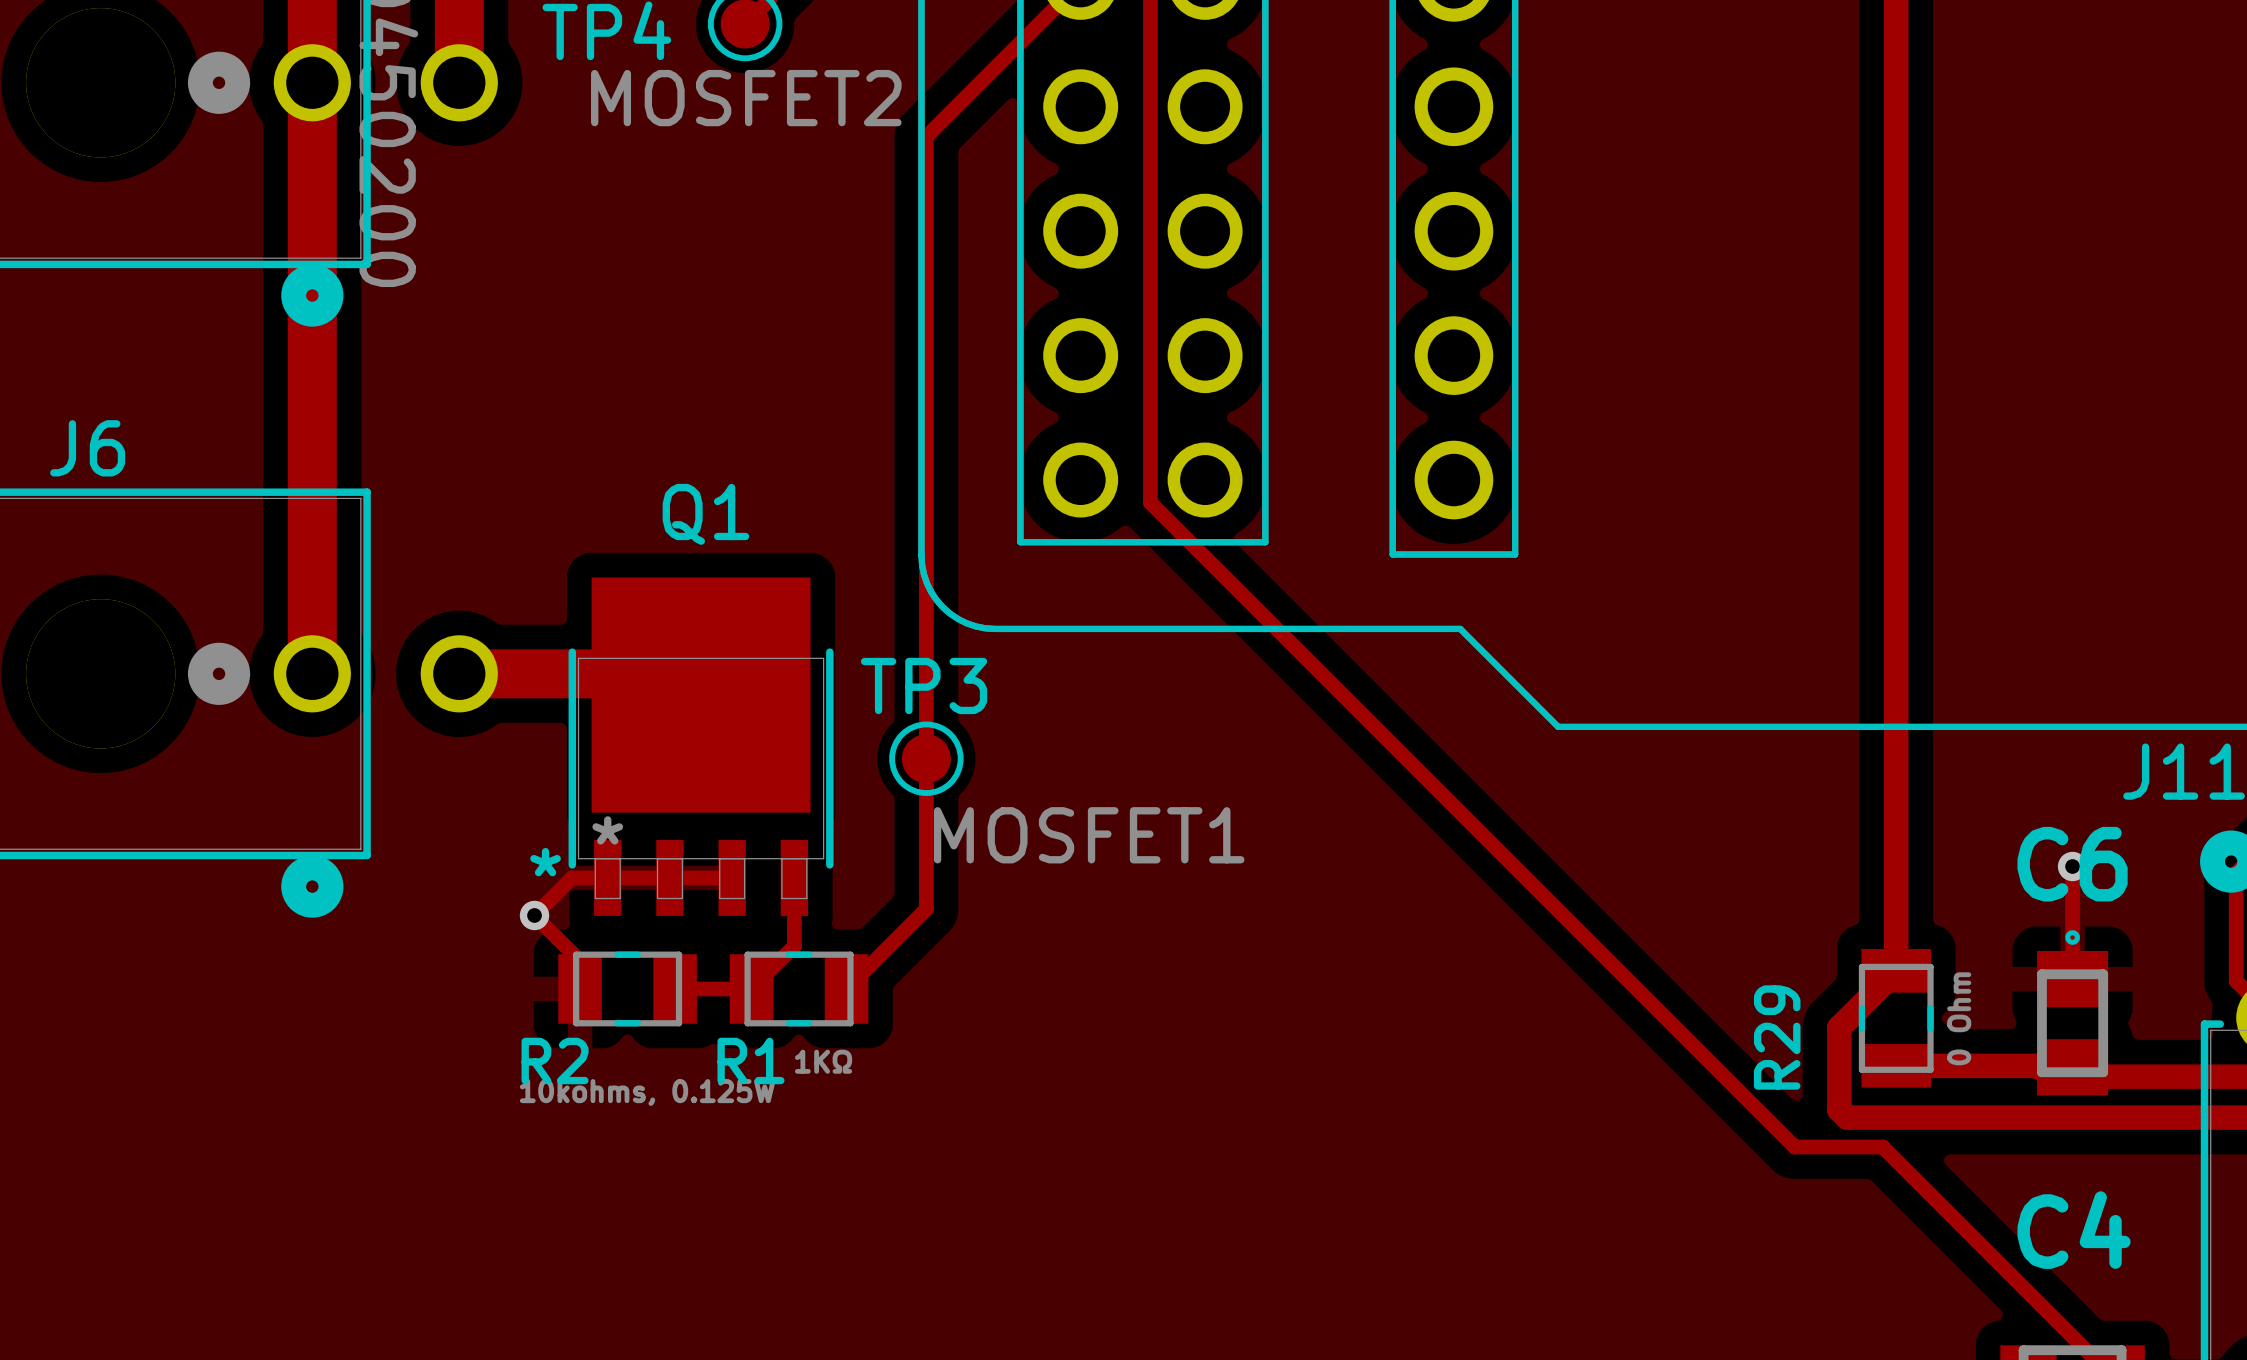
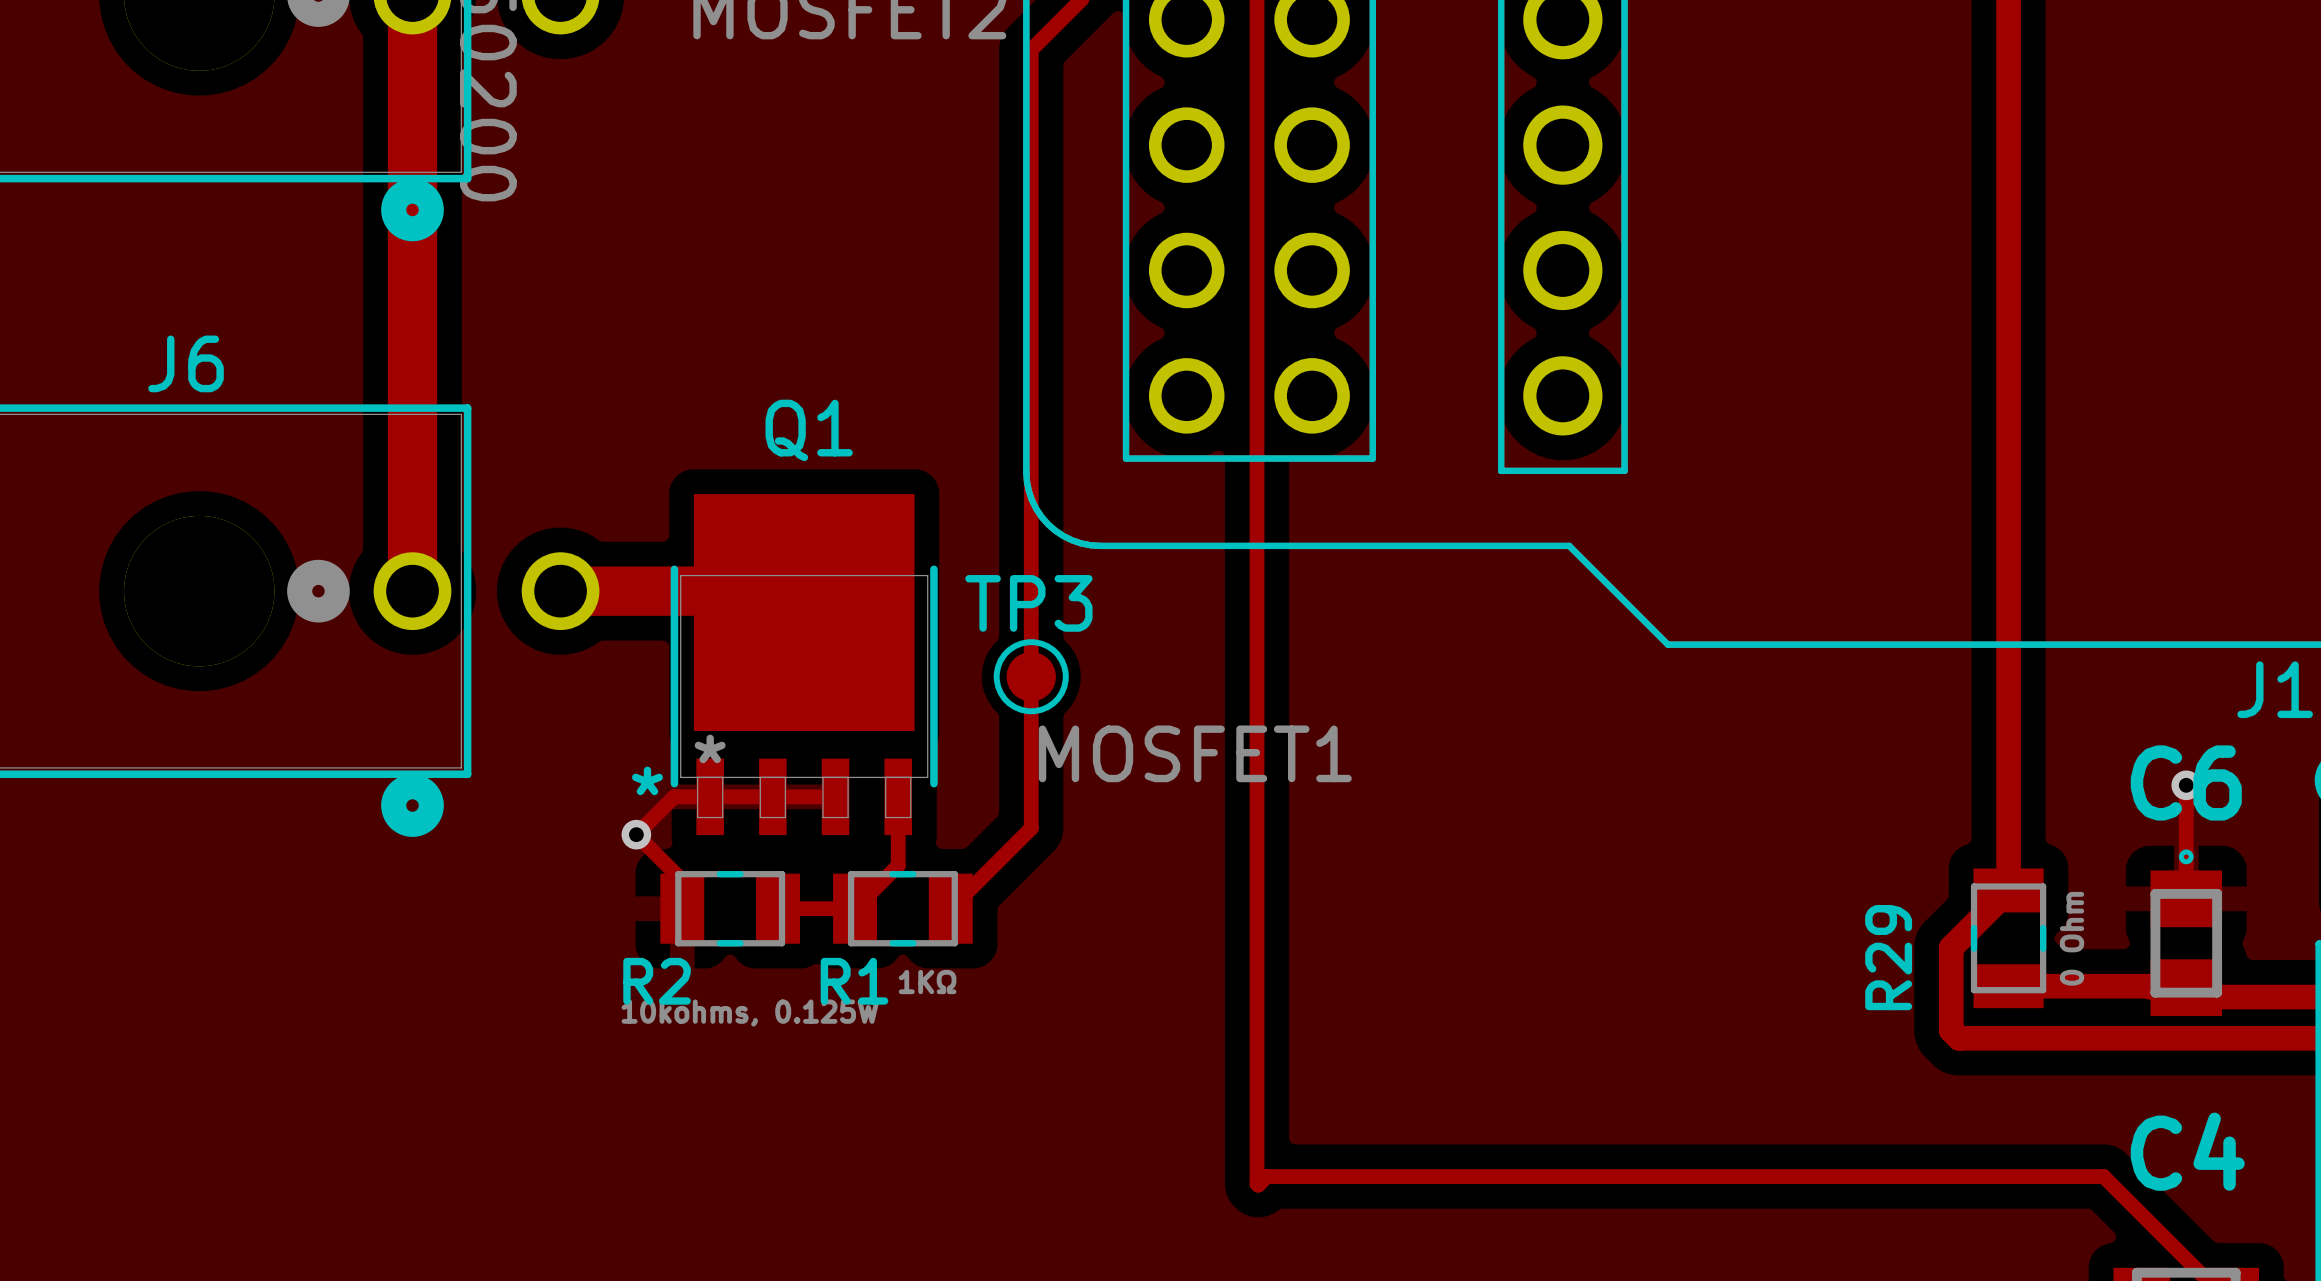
track: (1150, 502) (1794, 1147) (1882, 1147) (1990, 1254) -> (1257, 418) (1258, 1185) (1266, 1176) (2103, 1176)

